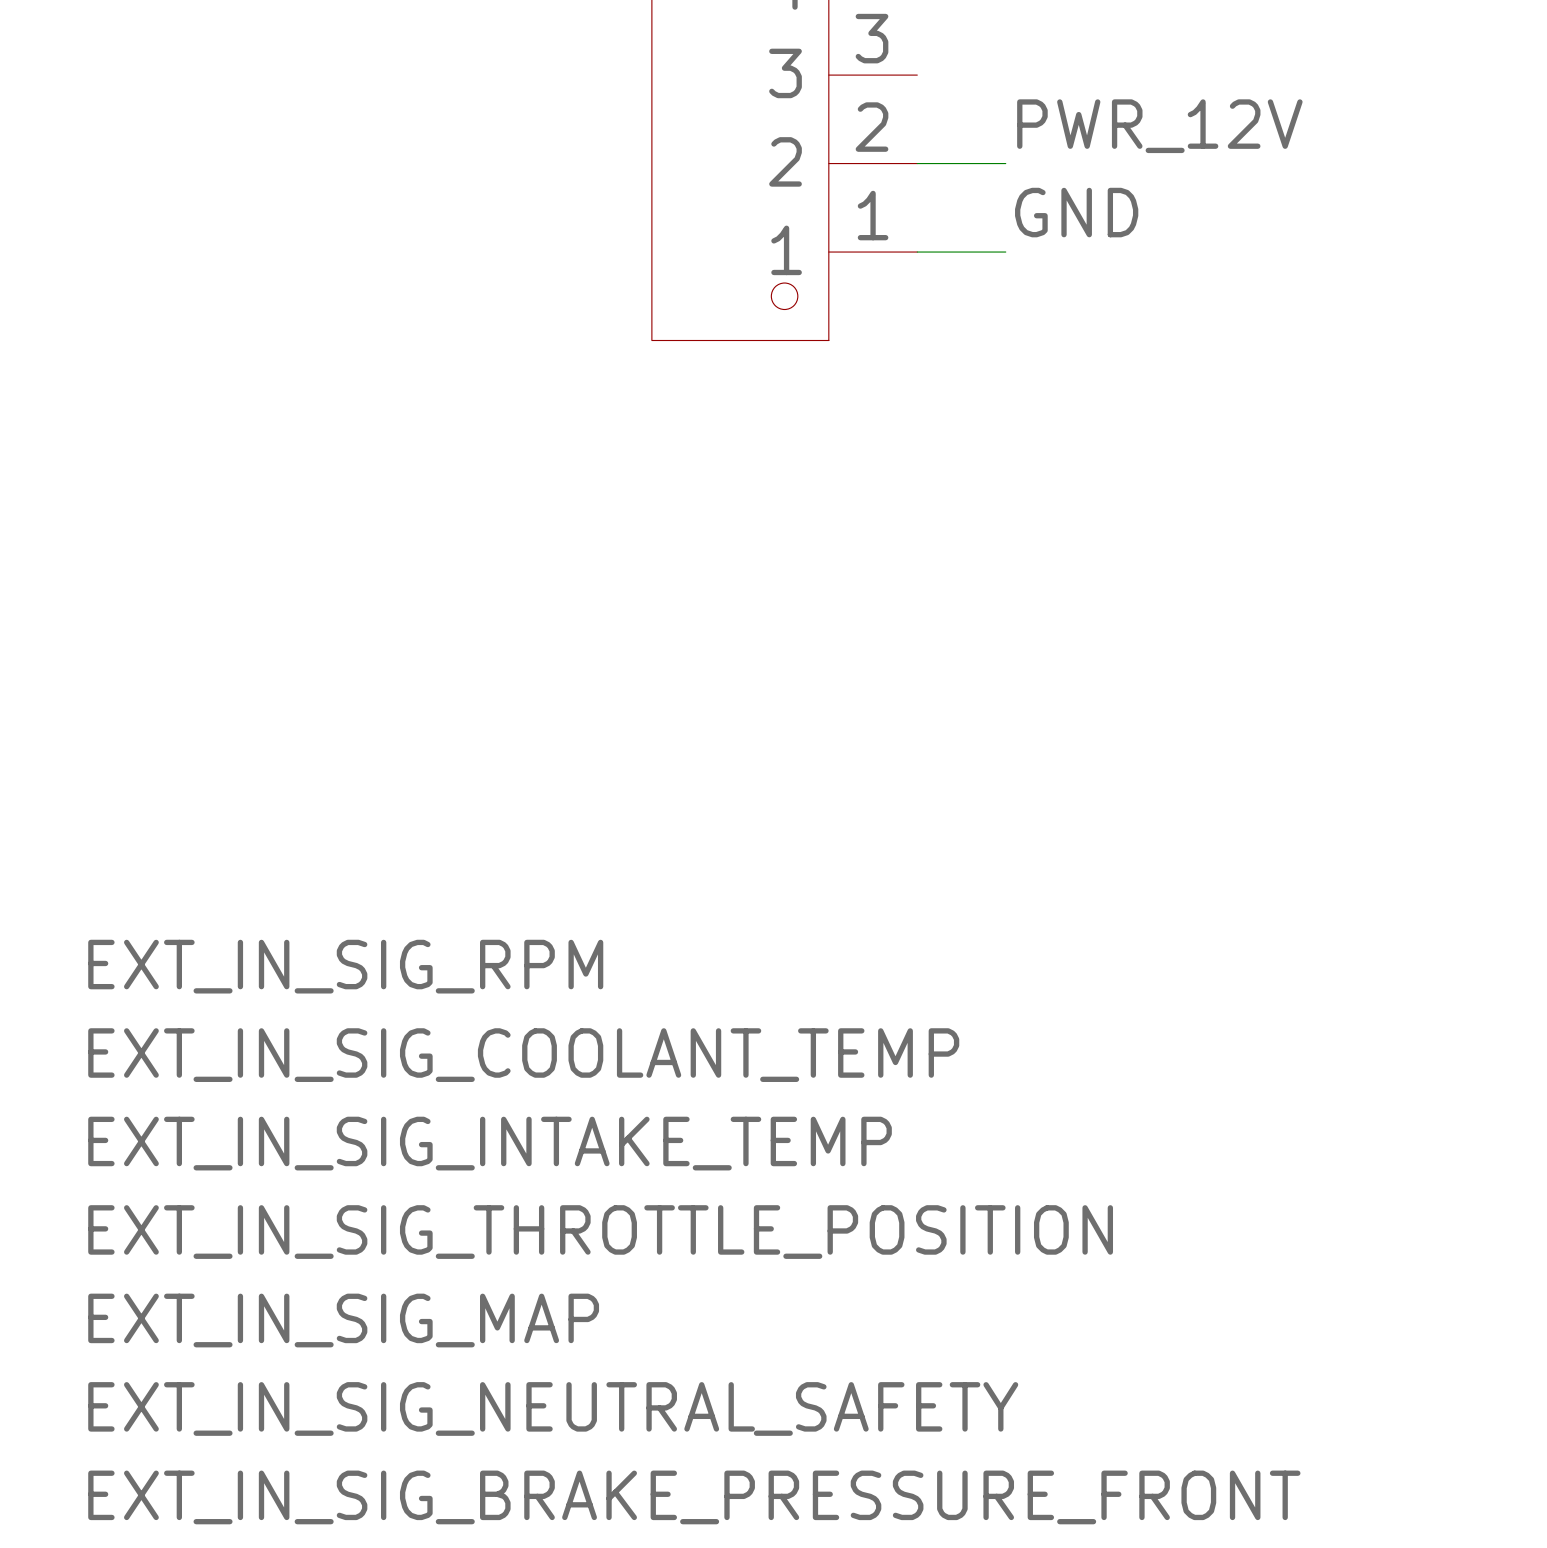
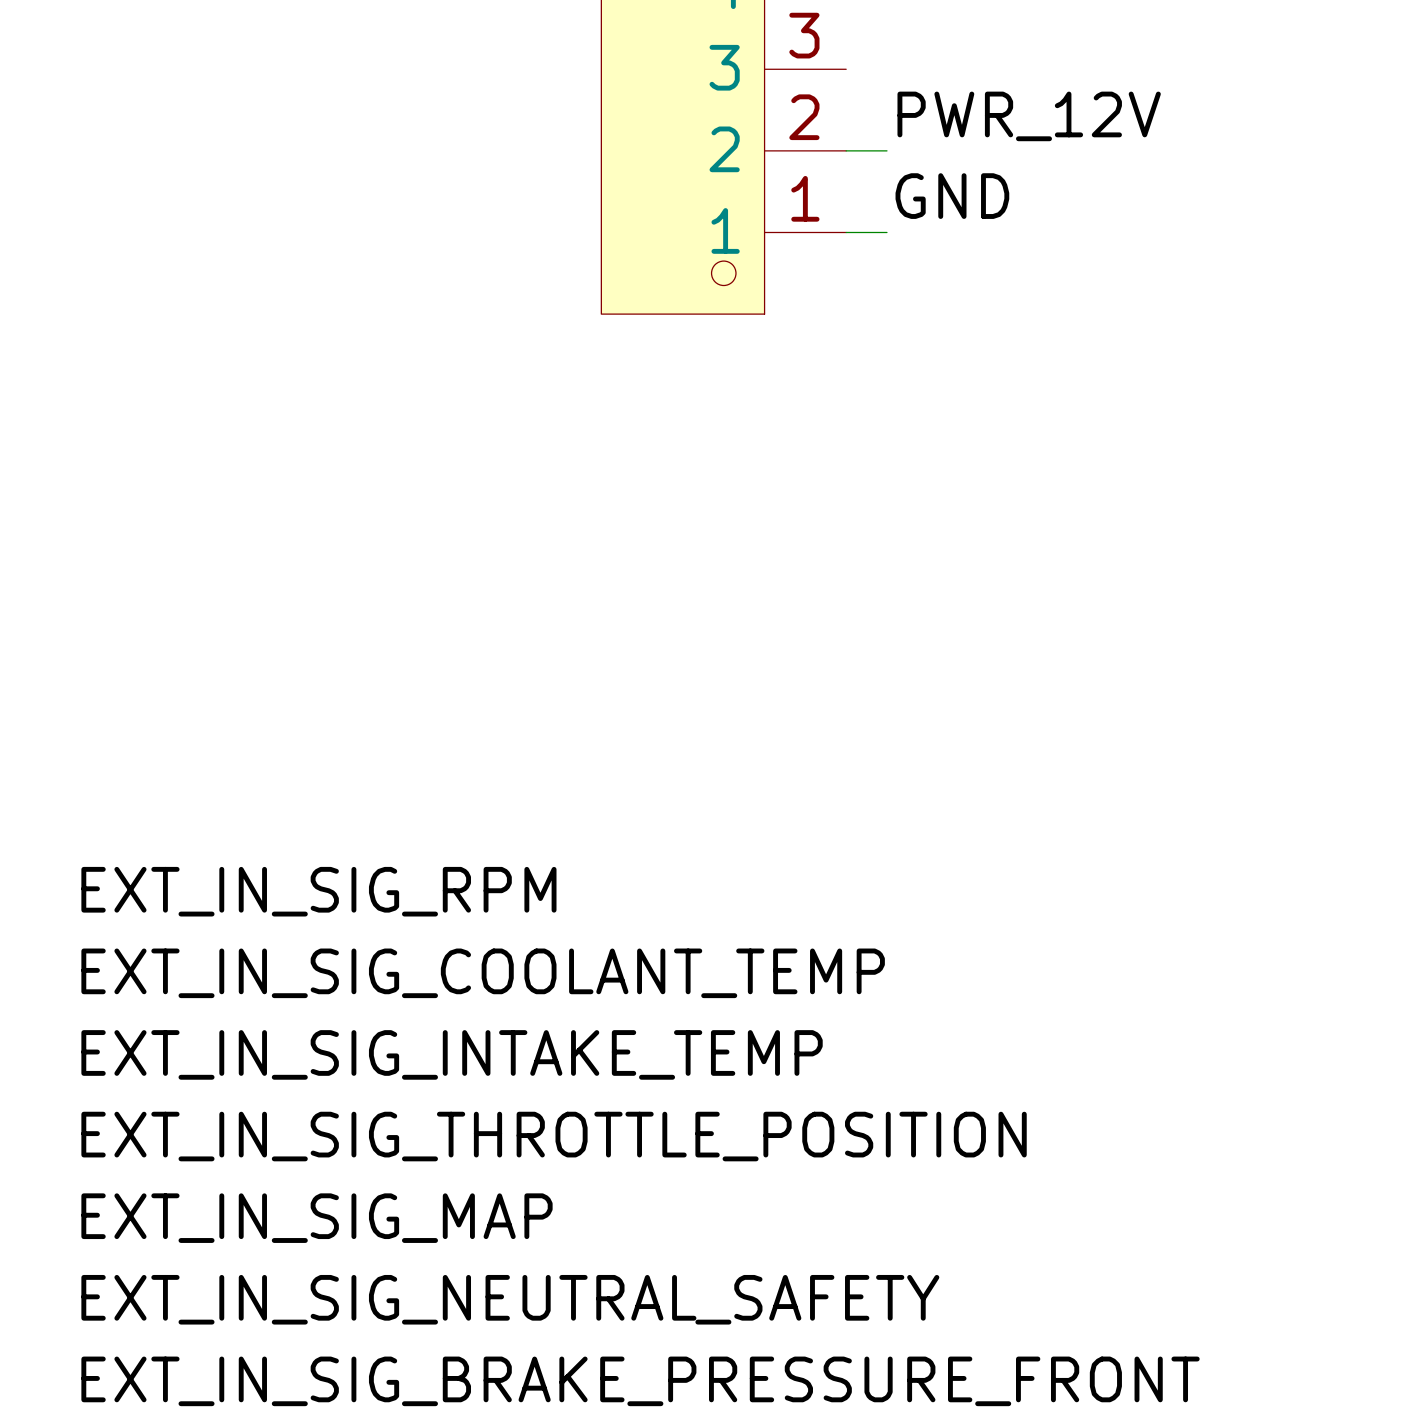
label position: PWR_12V (1159, 126) -> PWR_12V (1029, 116)
wire: (961, 163) (1005, 163) -> none
label position: GND (1076, 212) -> GND (952, 196)
wire: (961, 252) (1005, 252) -> none

